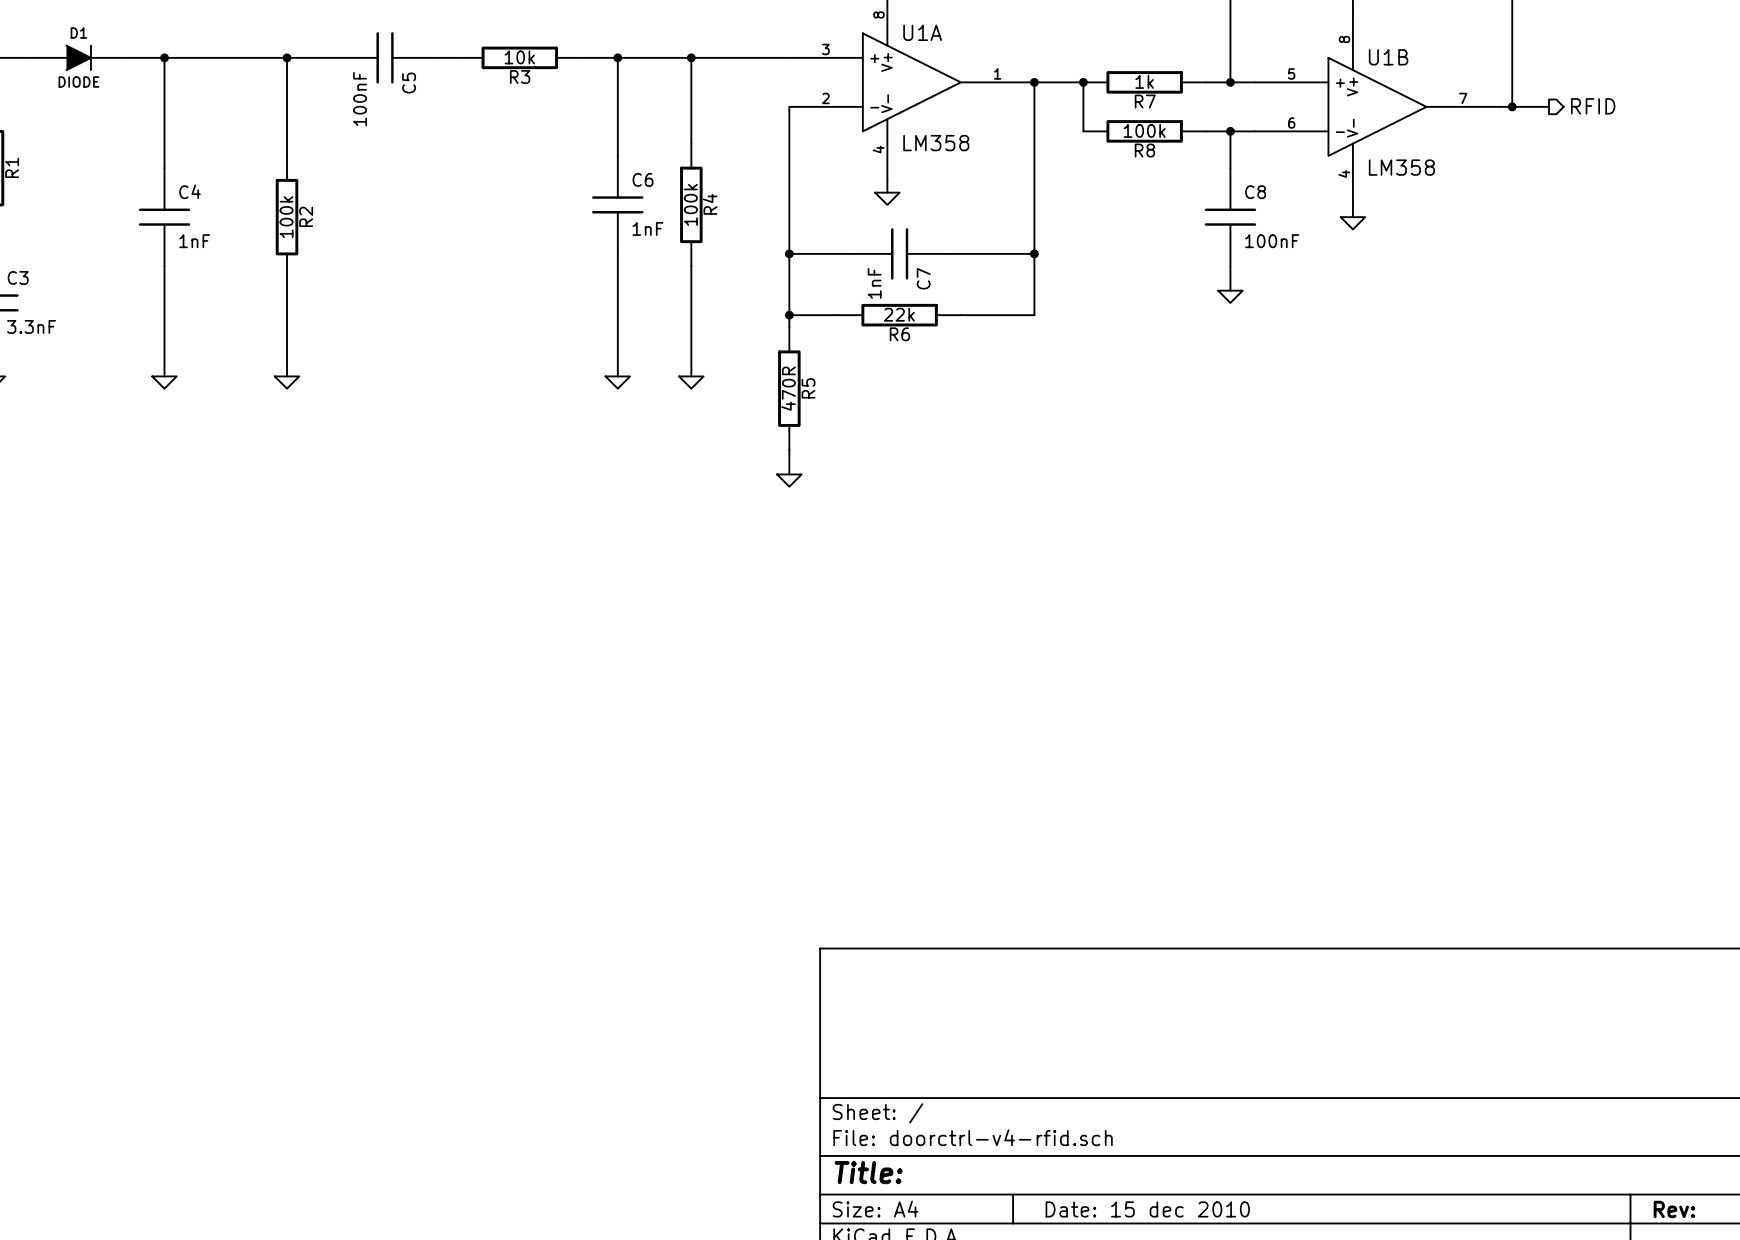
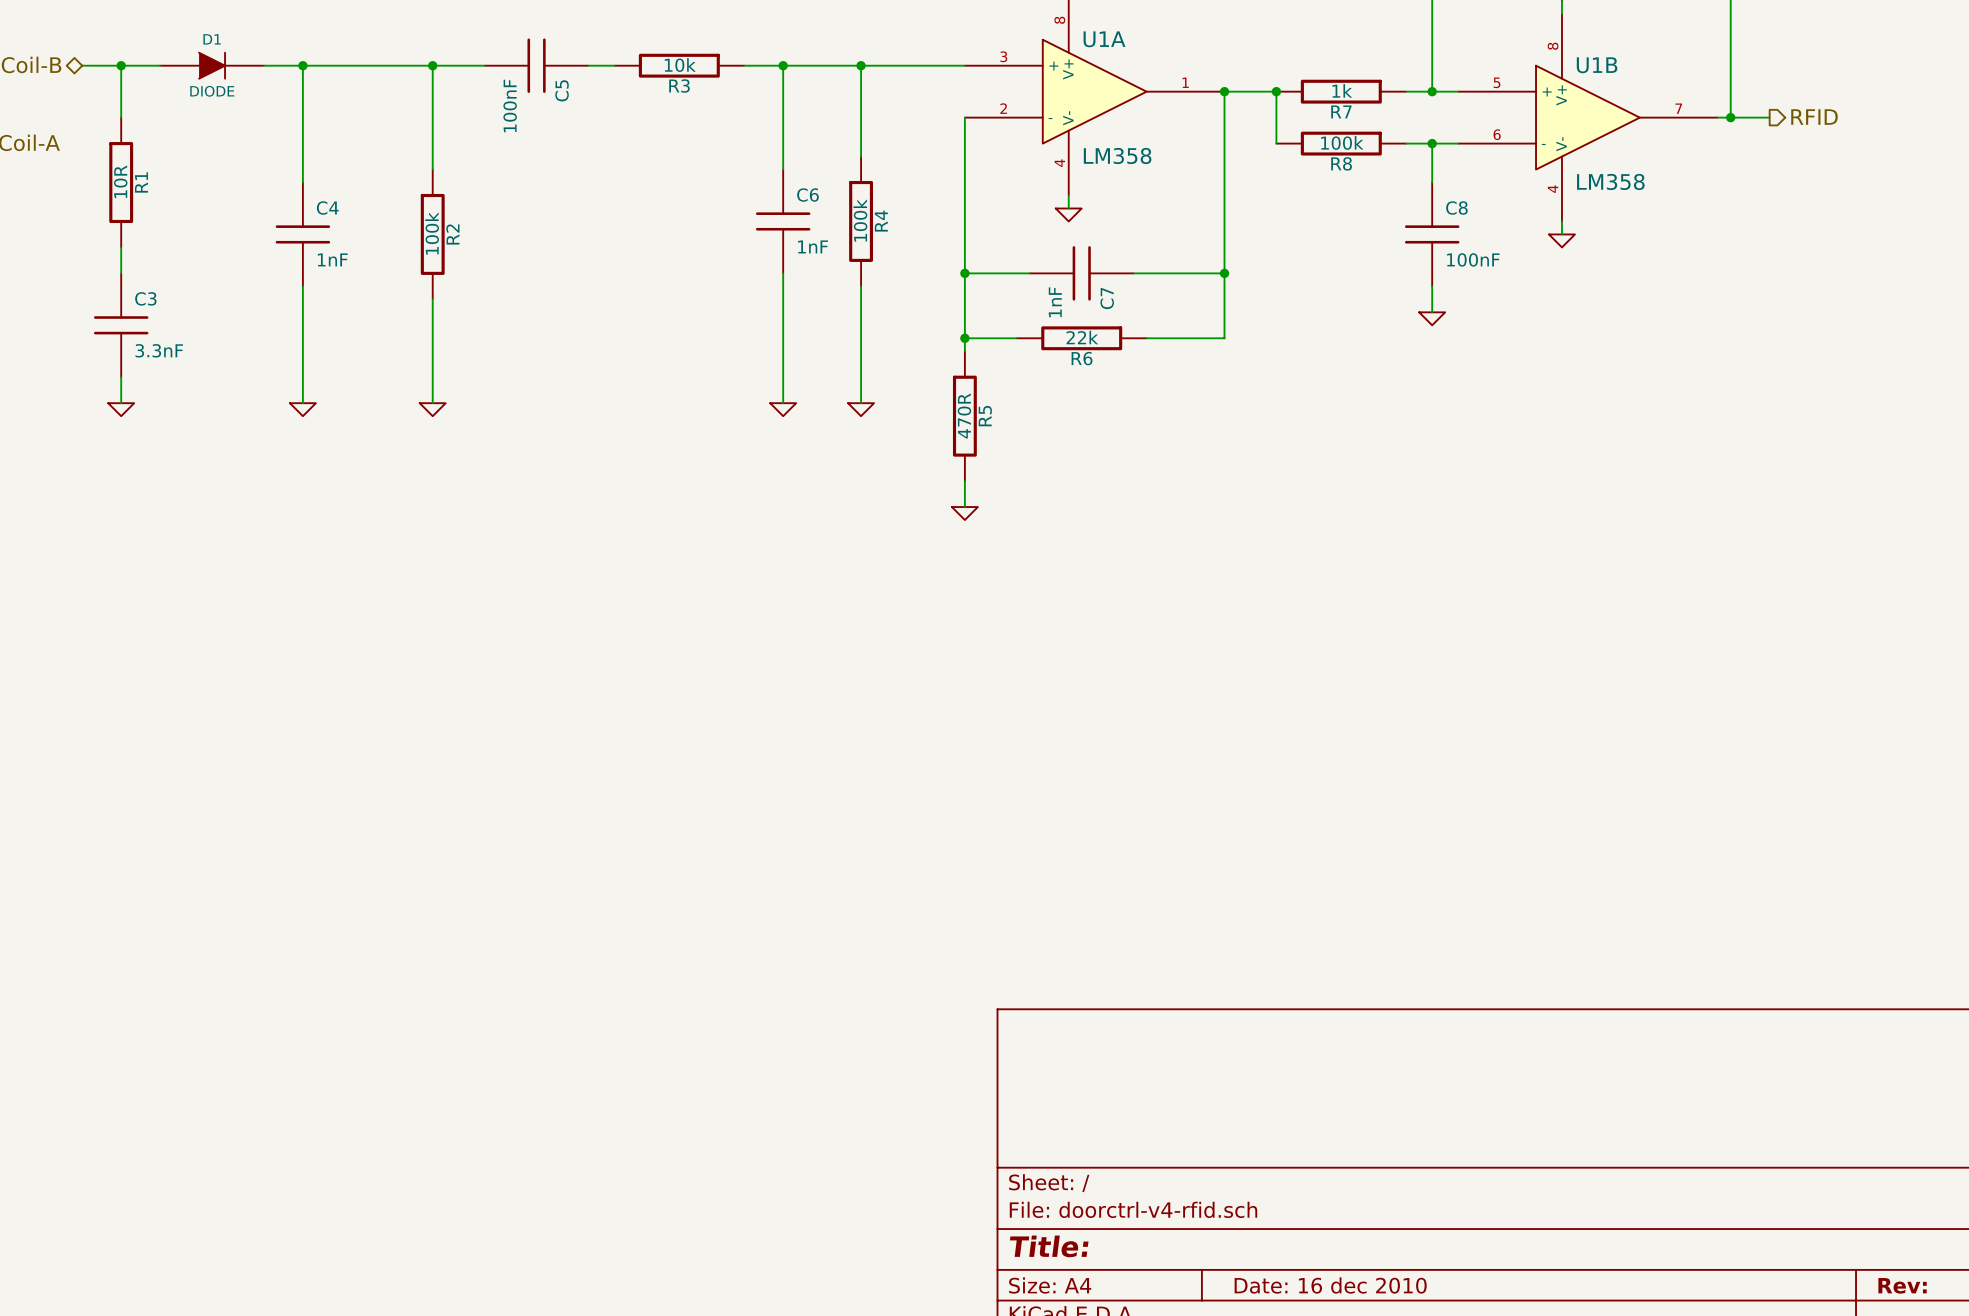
title block: Date: 15 dec 2010 (1147, 1209) -> Date: 16 dec 2010 (1330, 1285)

